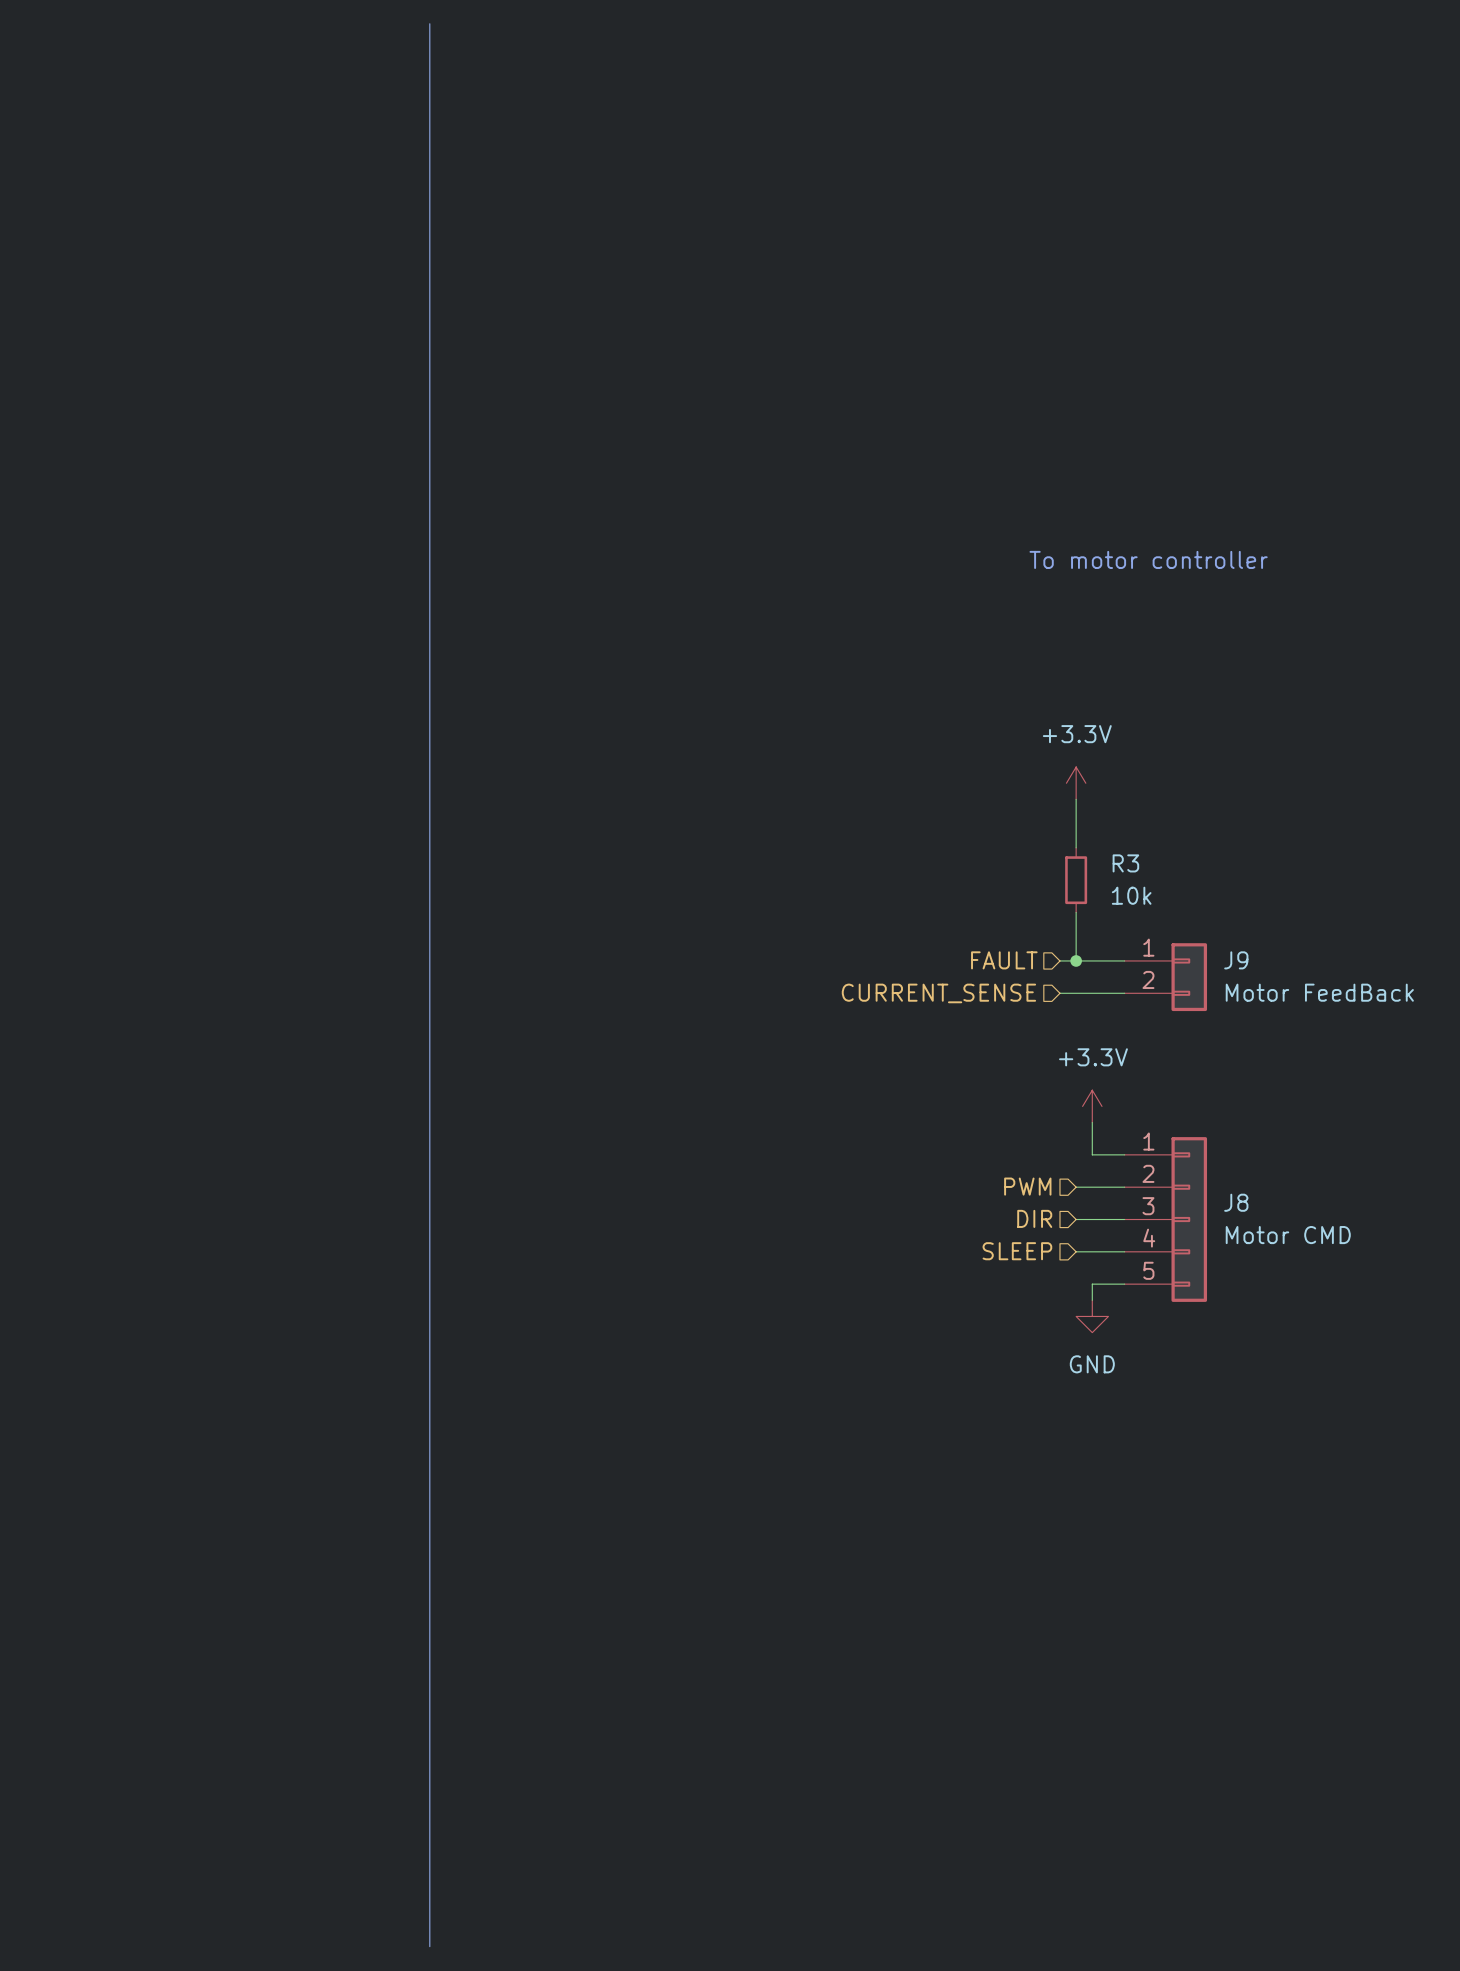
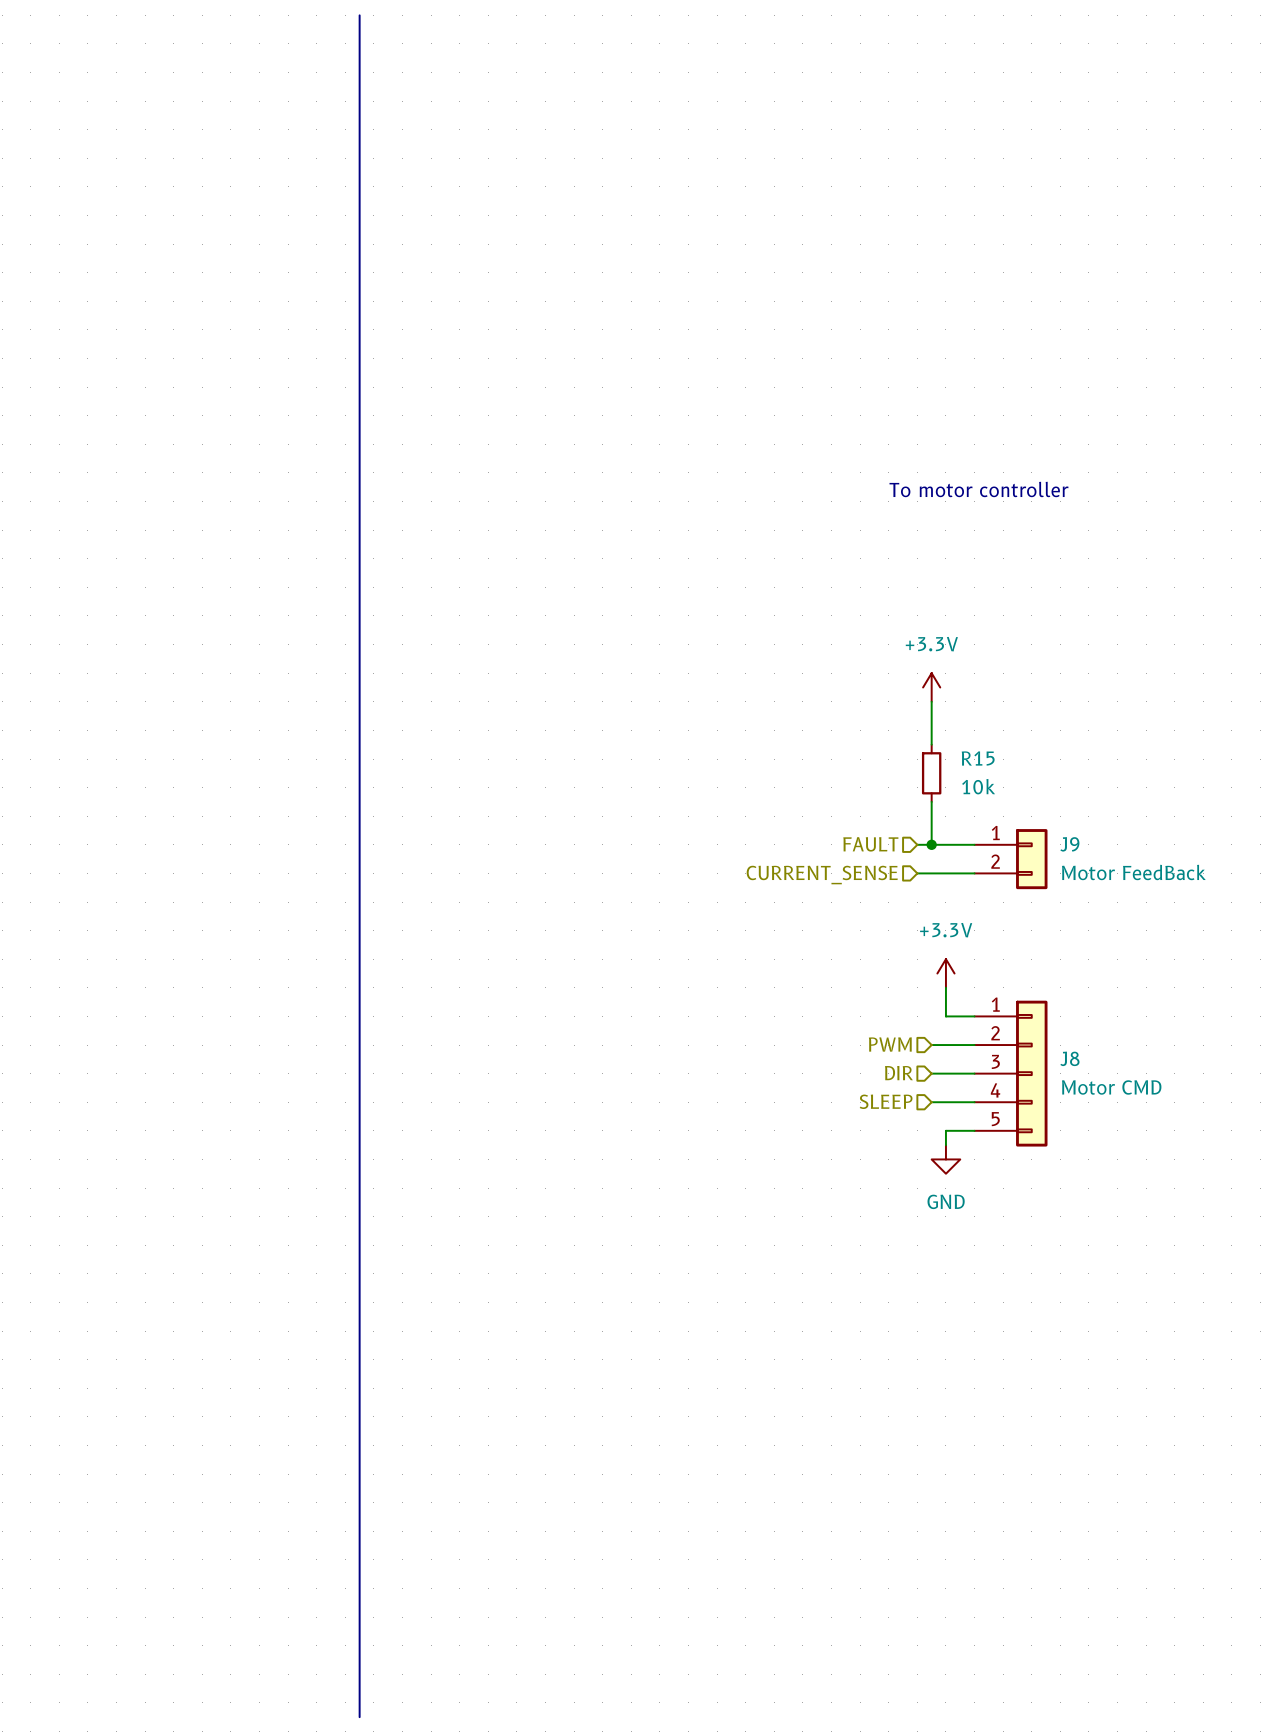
R3 name: R3 (1125, 863) -> R15 (978, 758)

